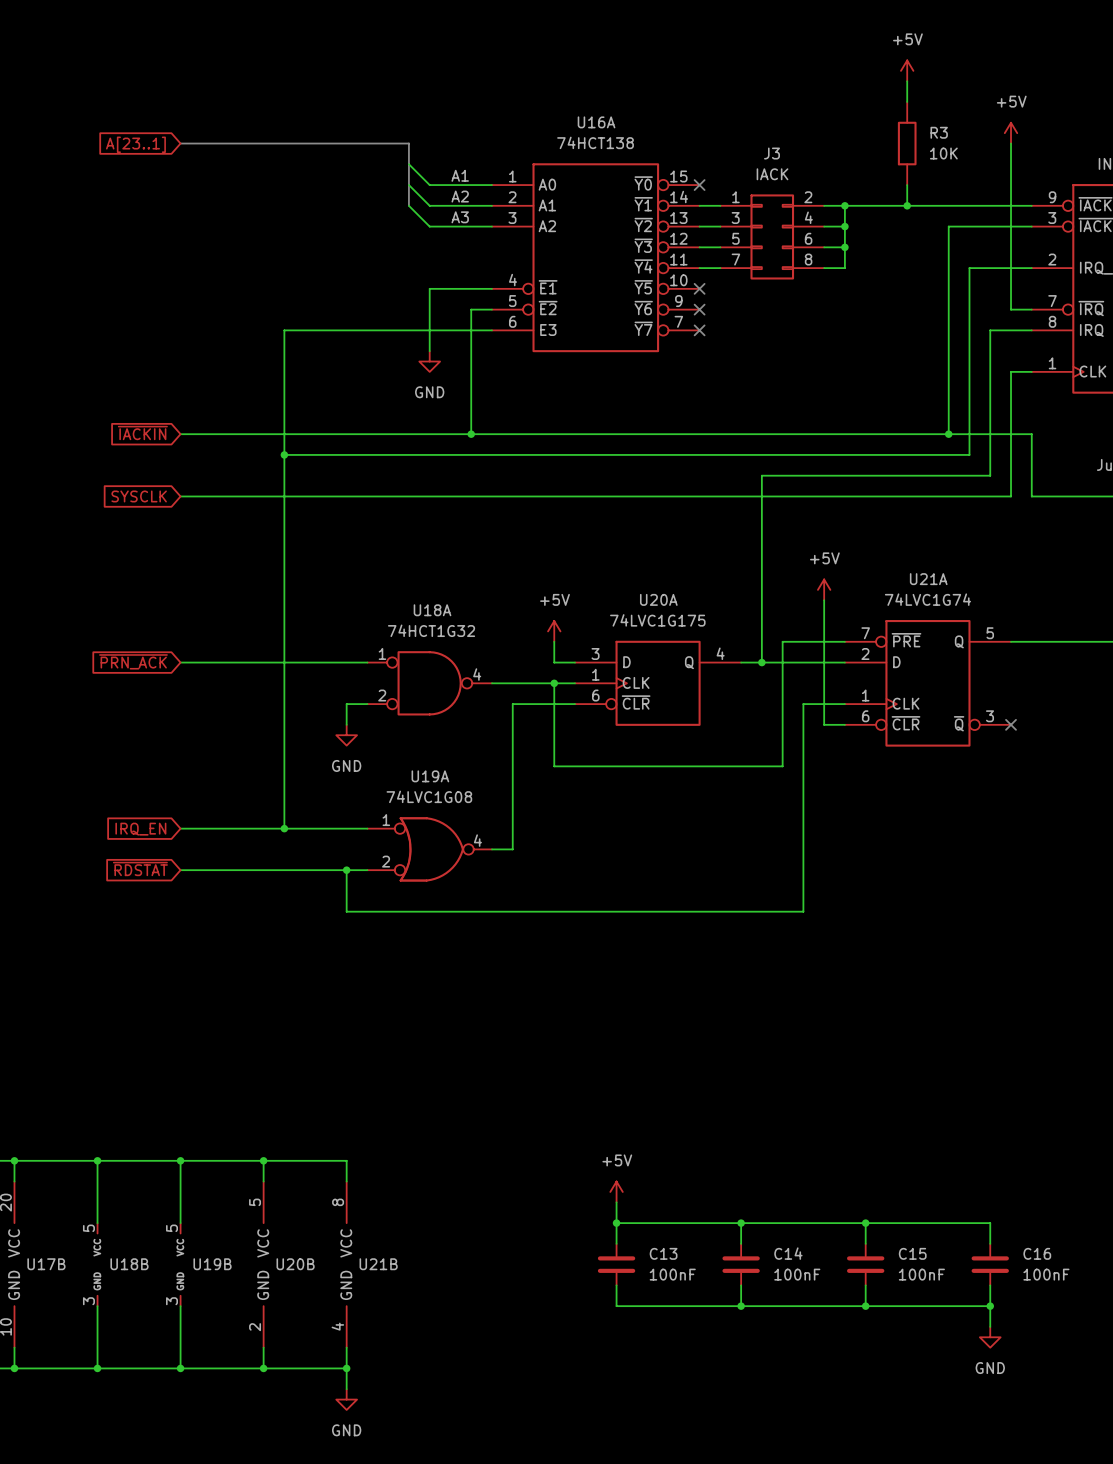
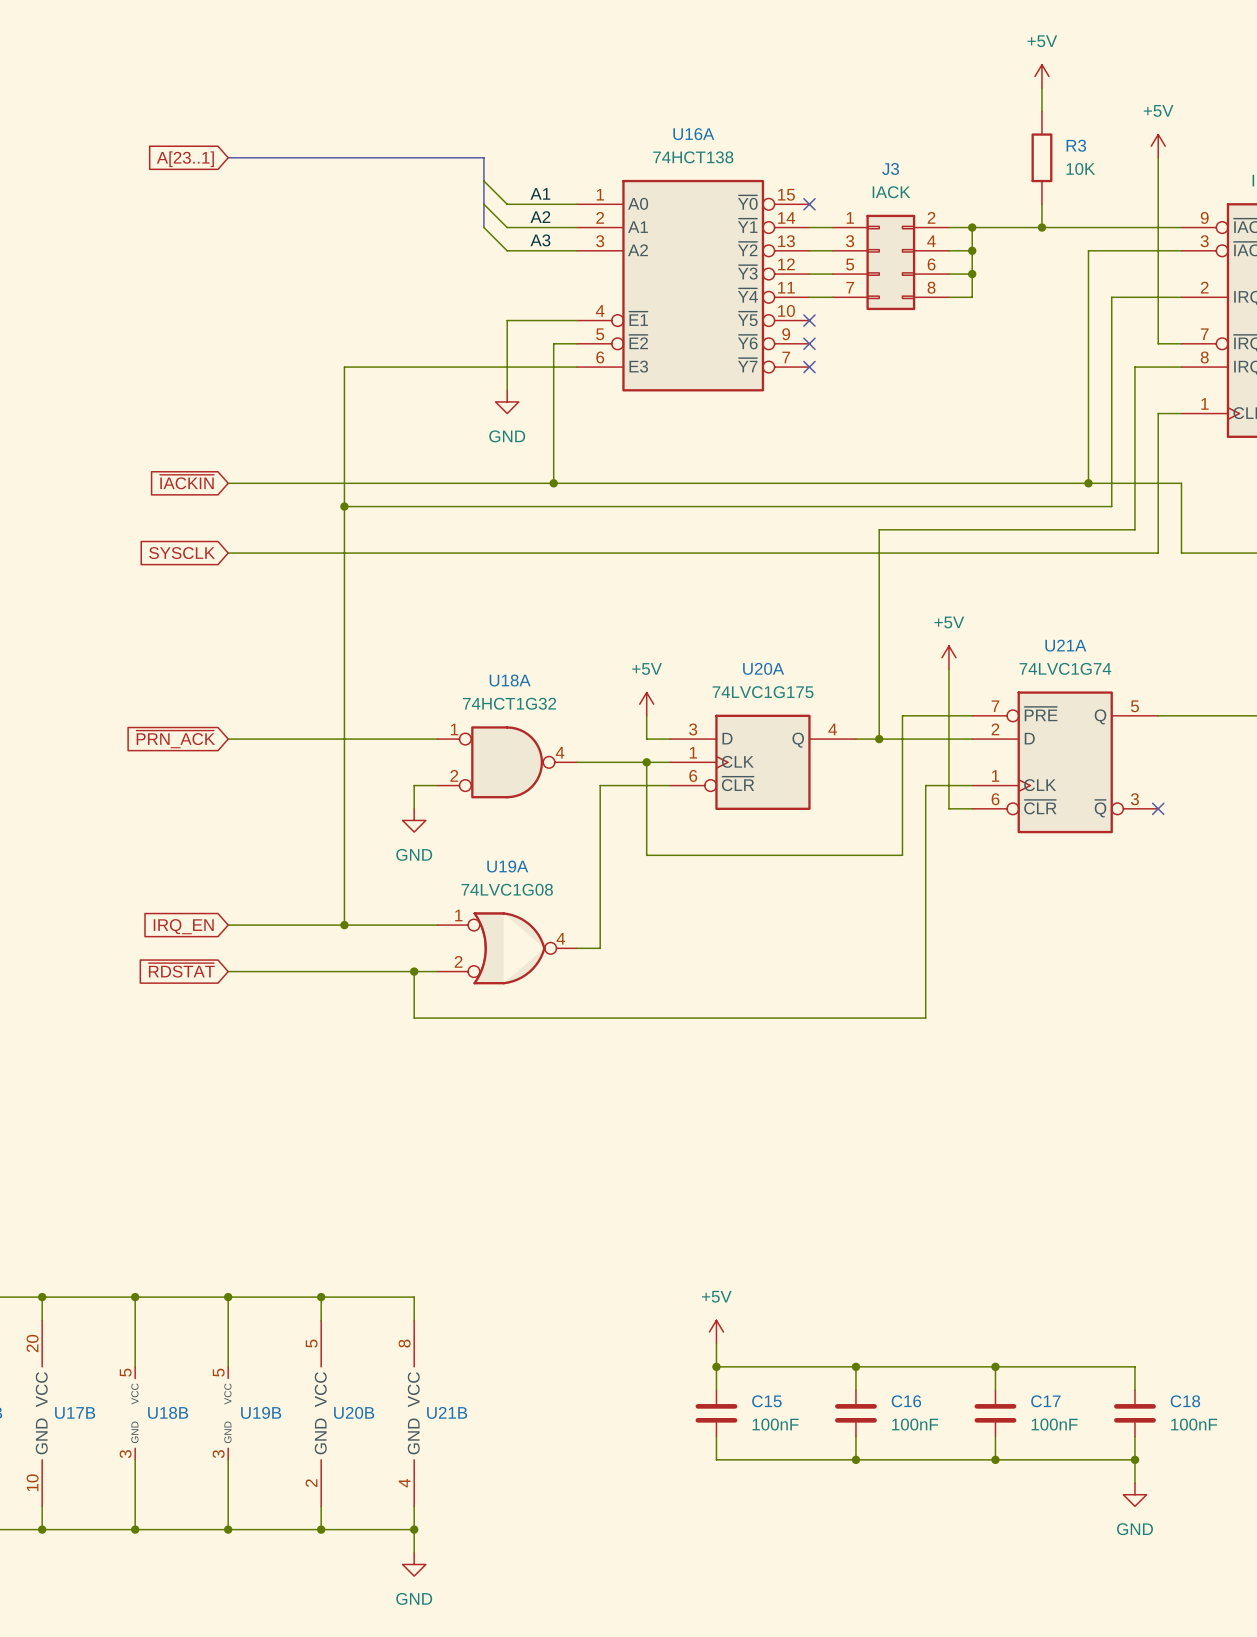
C13 name: C13 (663, 1253) -> C15 (766, 1401)
C14 name: C14 (788, 1253) -> C16 (906, 1401)
C15 name: C15 (912, 1253) -> C17 (1045, 1401)
C16 name: C16 (1037, 1253) -> C18 (1185, 1401)

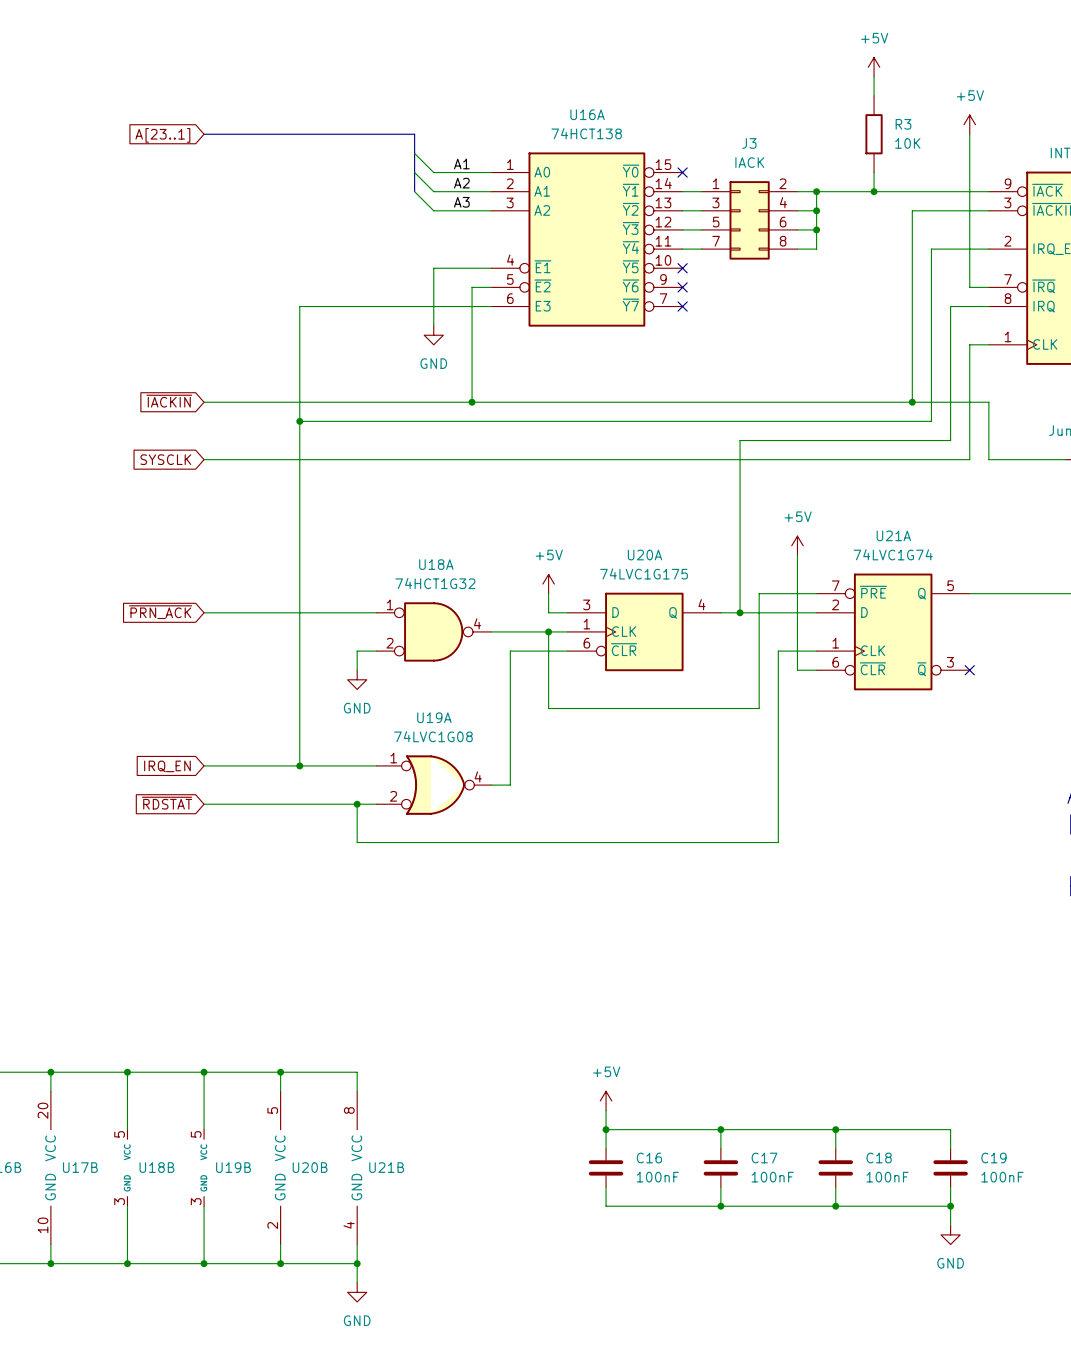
C15 name: C15 (766, 1401) -> C16 (649, 1158)
C16 name: C16 (906, 1401) -> C17 (764, 1158)
C17 name: C17 (1045, 1401) -> C18 (879, 1158)
C18 name: C18 (1185, 1401) -> C19 (993, 1158)

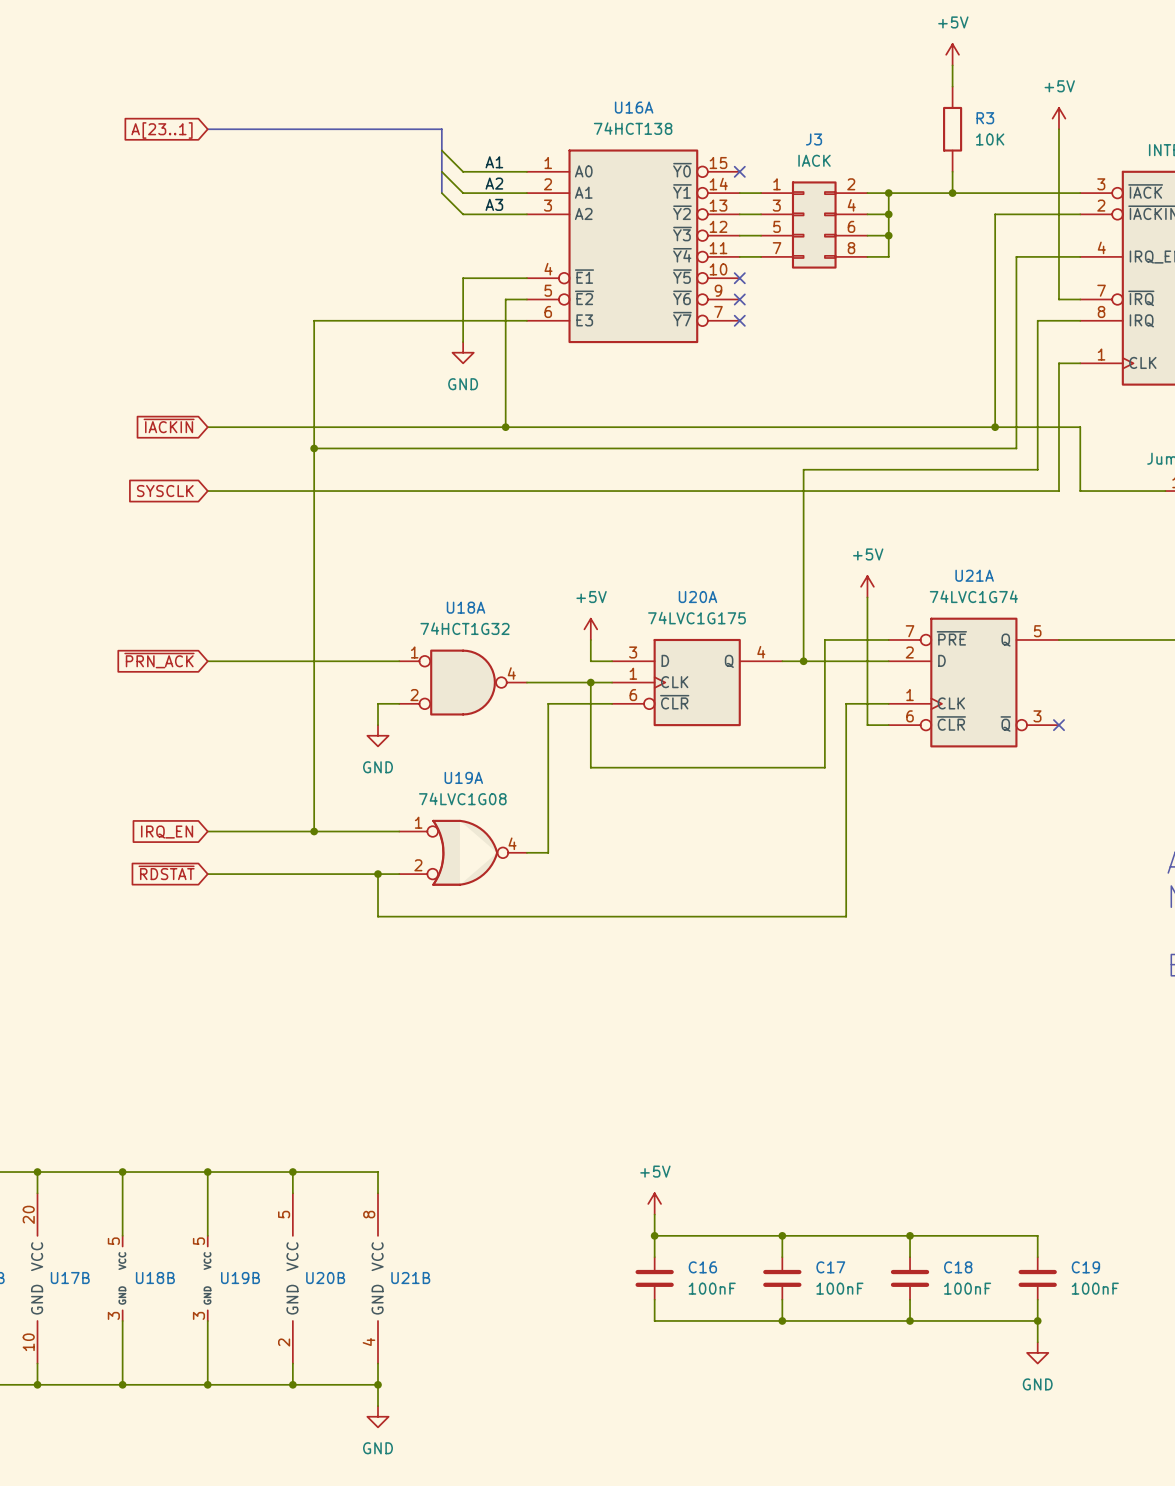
part pin number: 9 (1008, 183) -> 3 (1101, 184)
part pin number: 3 (1007, 202) -> 2 (1101, 205)
part pin number: 2 (1007, 241) -> 4 (1101, 247)

